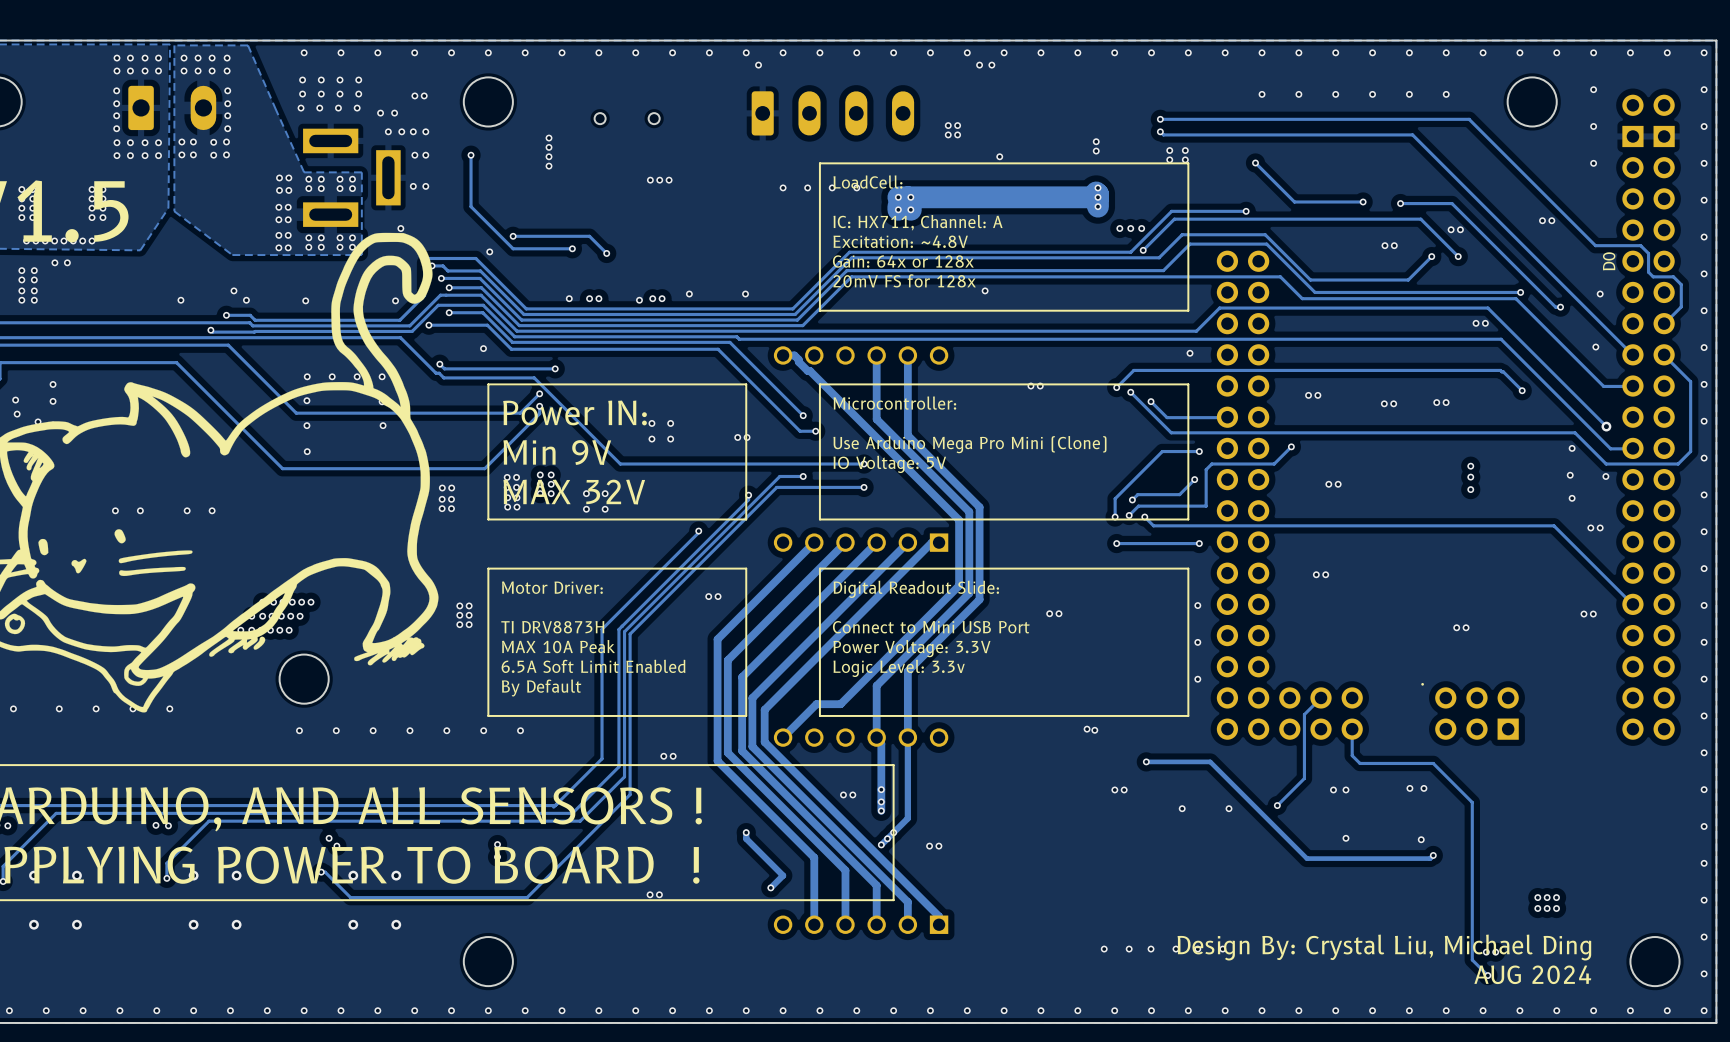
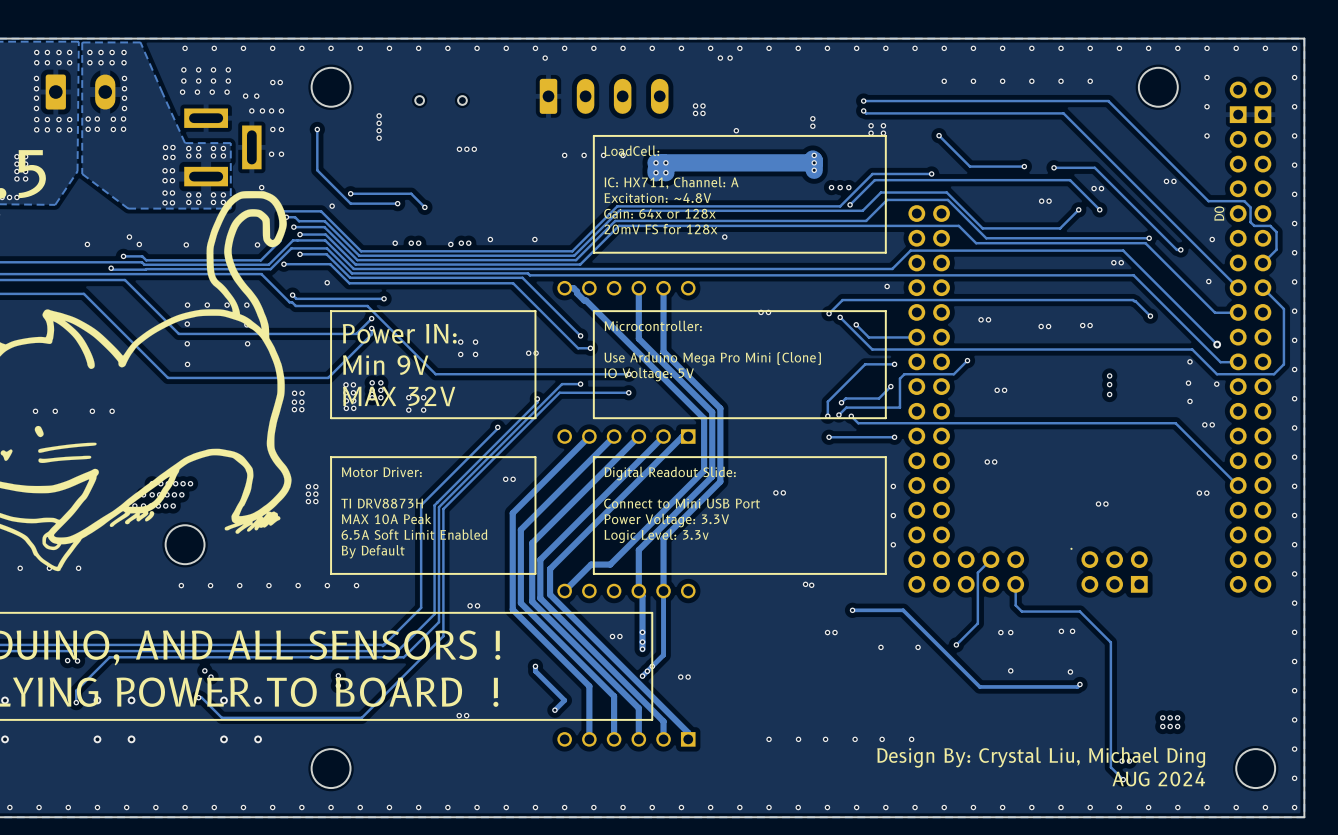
via: none -> (769, 739)
via: none -> (798, 739)
via: none -> (825, 739)
via: none -> (855, 739)
via: none -> (882, 739)
via: none -> (911, 739)
via: (1104, 949) -> none
via: (1129, 949) -> none
via: (1151, 949) -> none
via: (1175, 949) -> none
via: (1197, 949) -> none
via: (1222, 949) -> none

